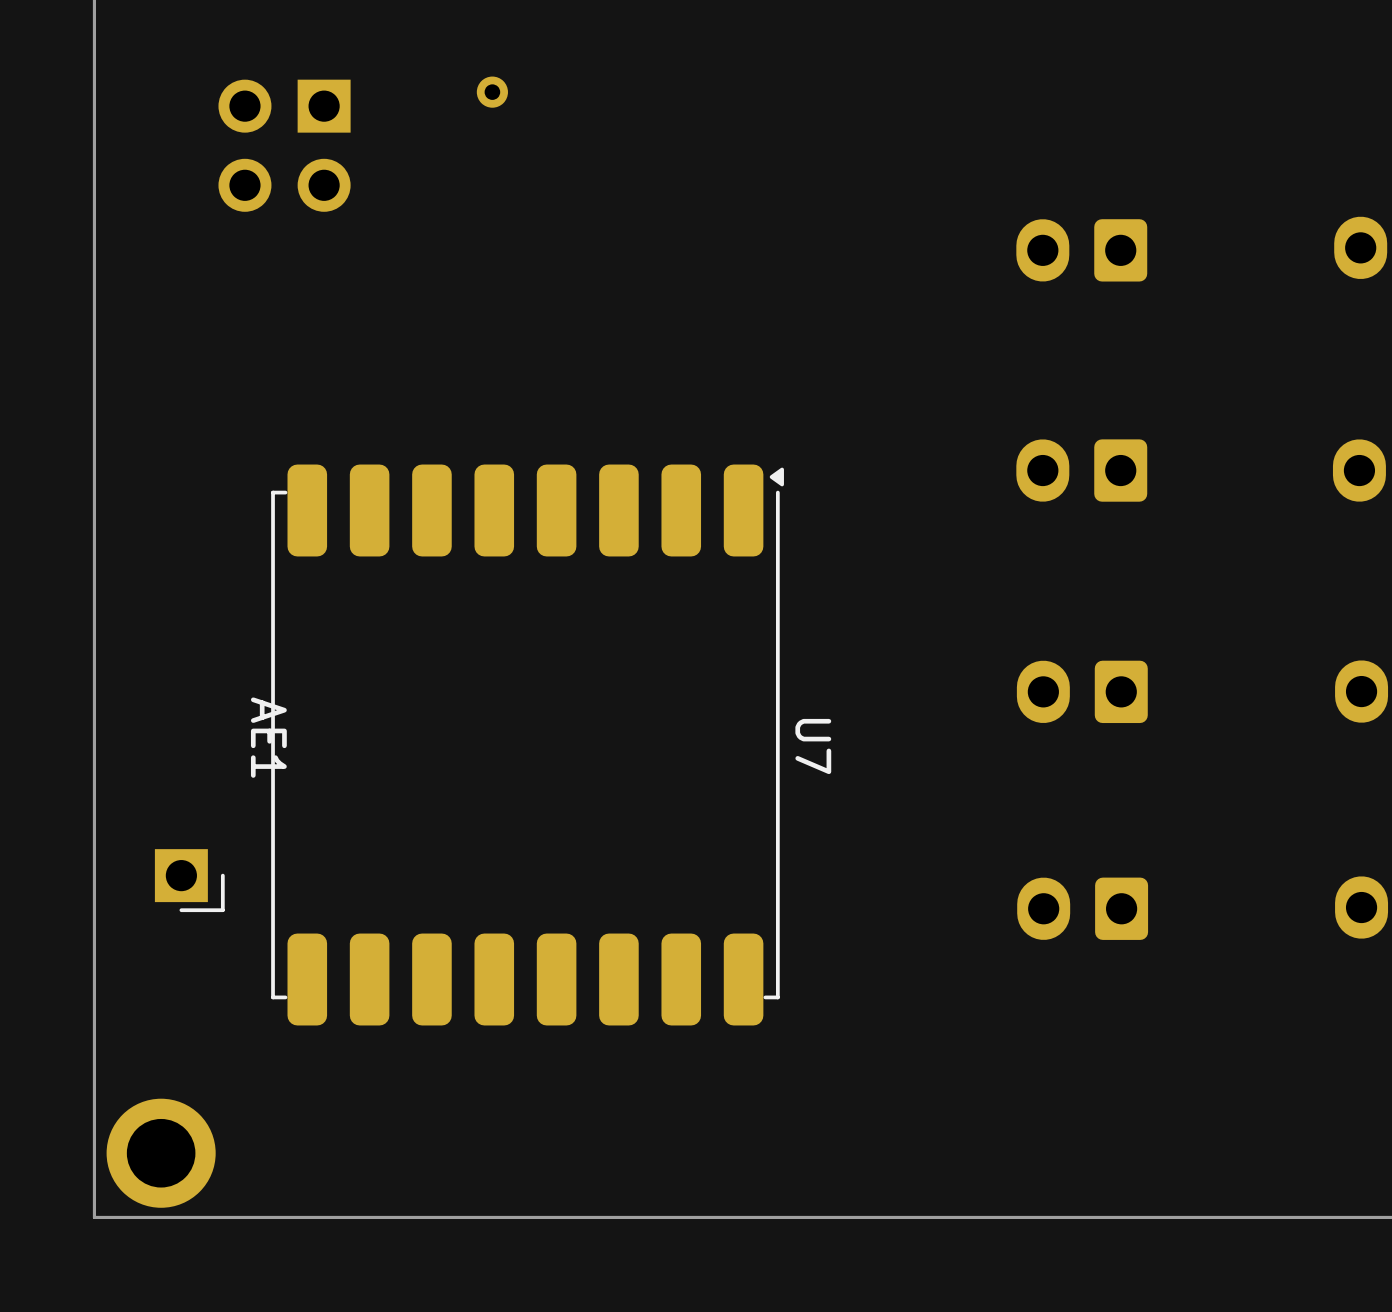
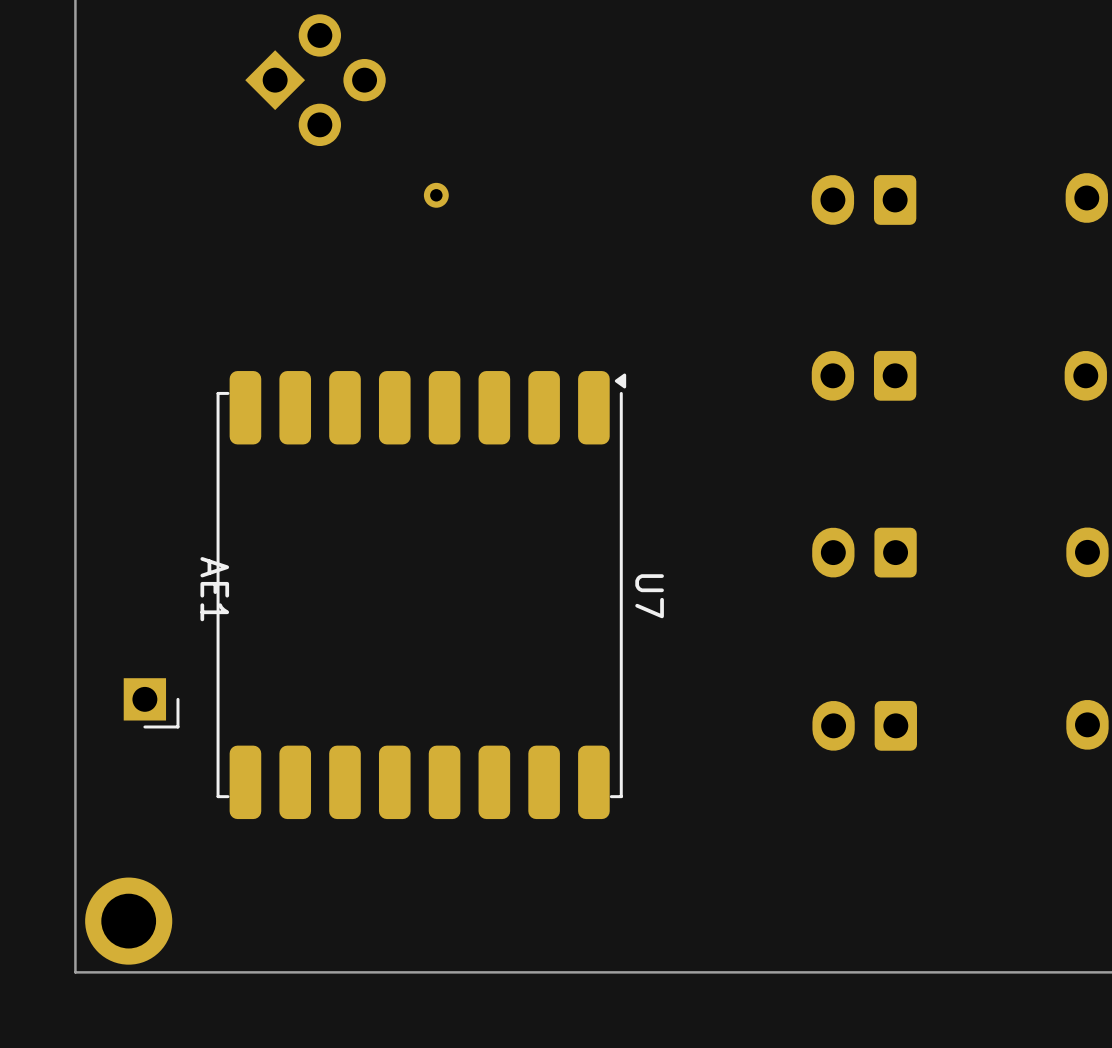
part position: (492, 92) -> (436, 195)
part: none -> (315, 80)
part: (284, 145) -> none

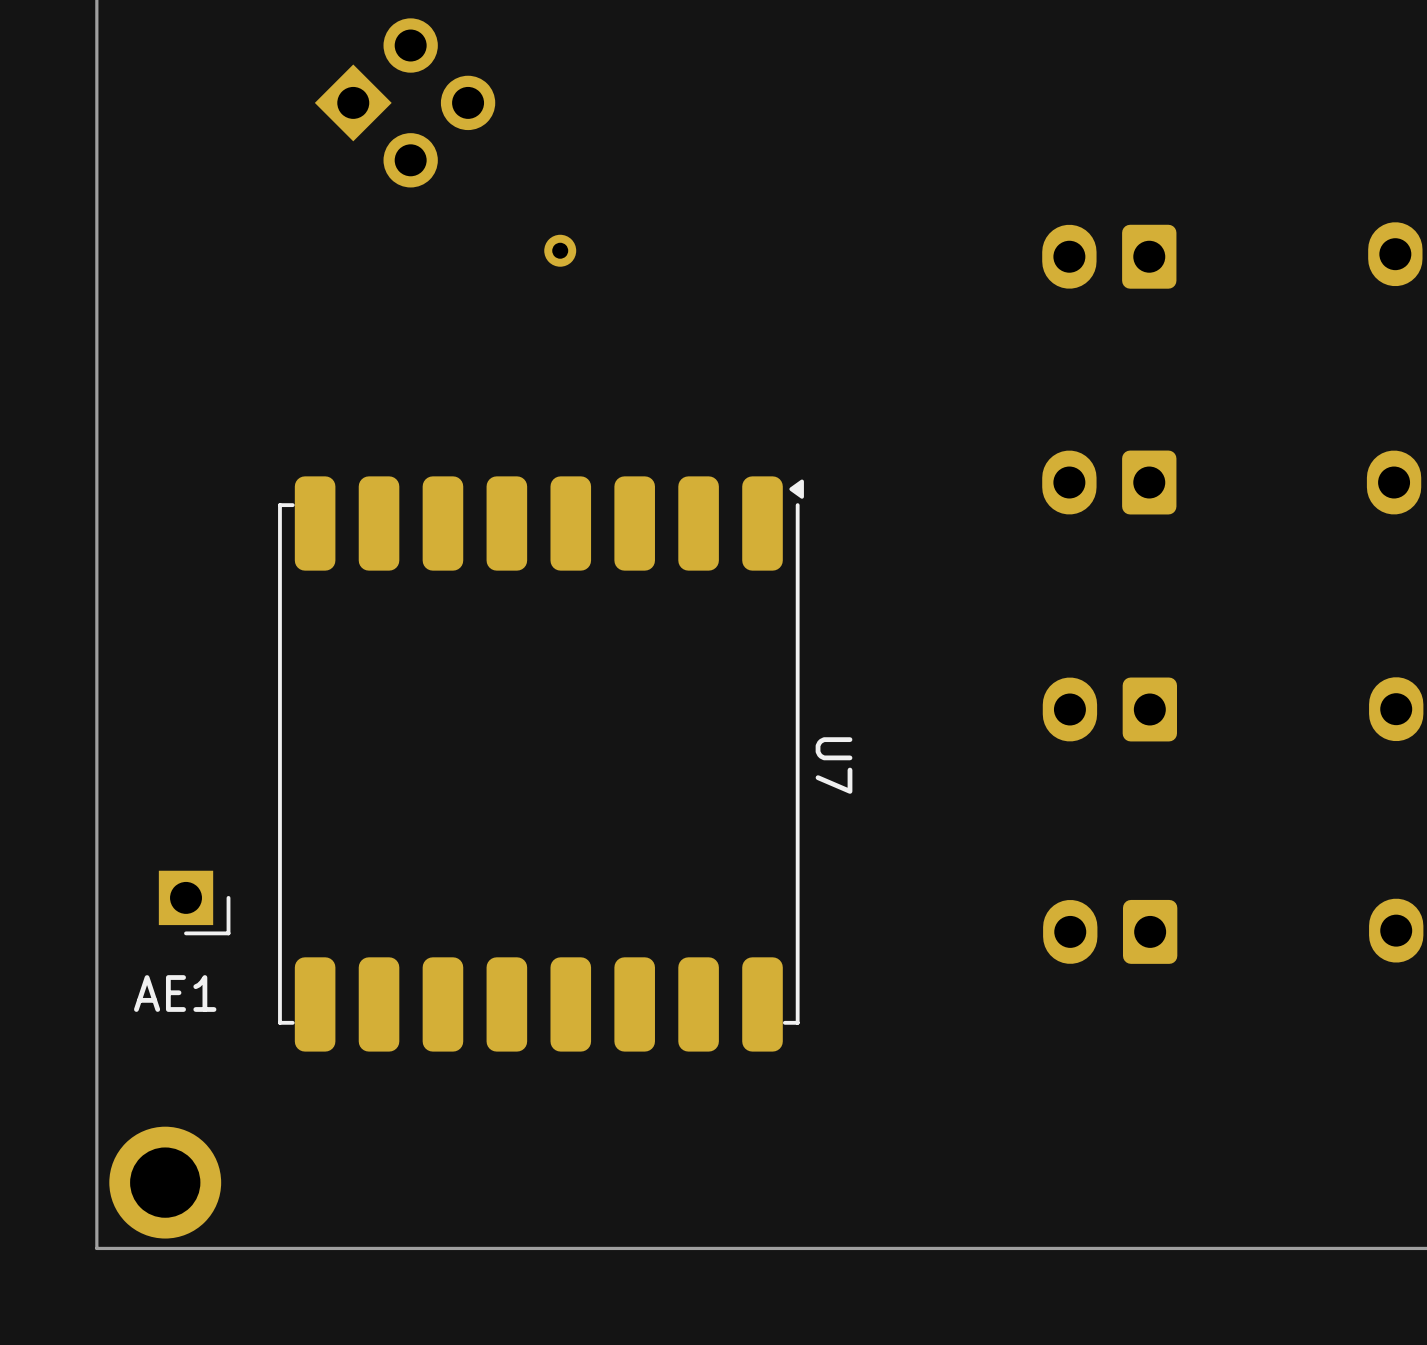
AE1 name rotation: 0° (214, 589) -> 90° counterclockwise (175, 993)
AE1 name position: AE1 (214, 589) -> AE1 (175, 993)

